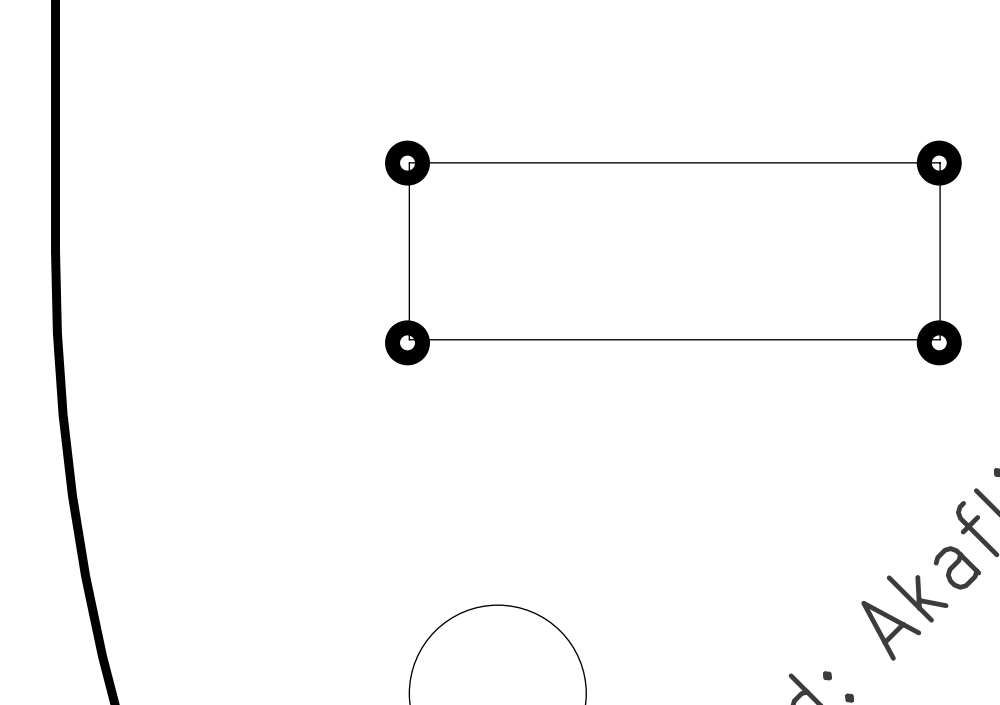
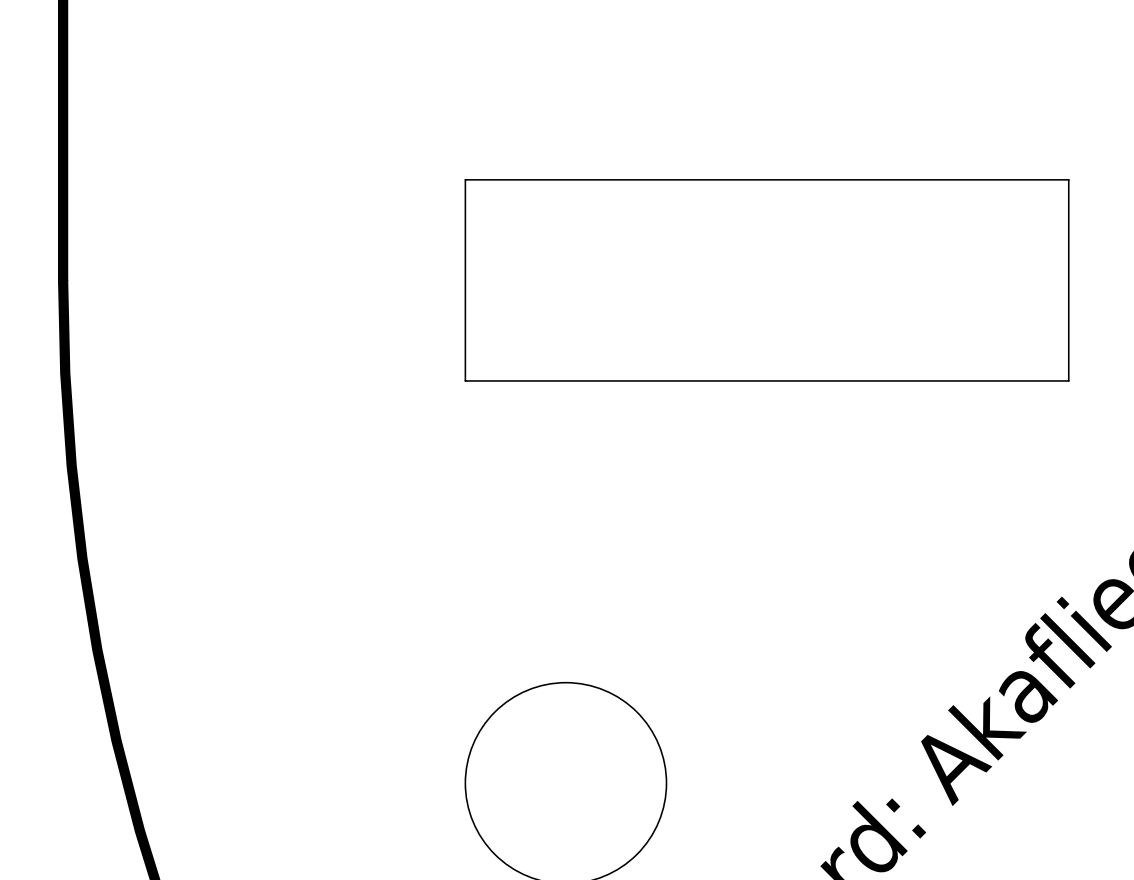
round board edge: [385, 140, 430, 186] -> none
round board edge: [916, 140, 962, 186] -> none
round board edge: [385, 320, 430, 366] -> none
round board edge: [916, 320, 962, 366] -> none

